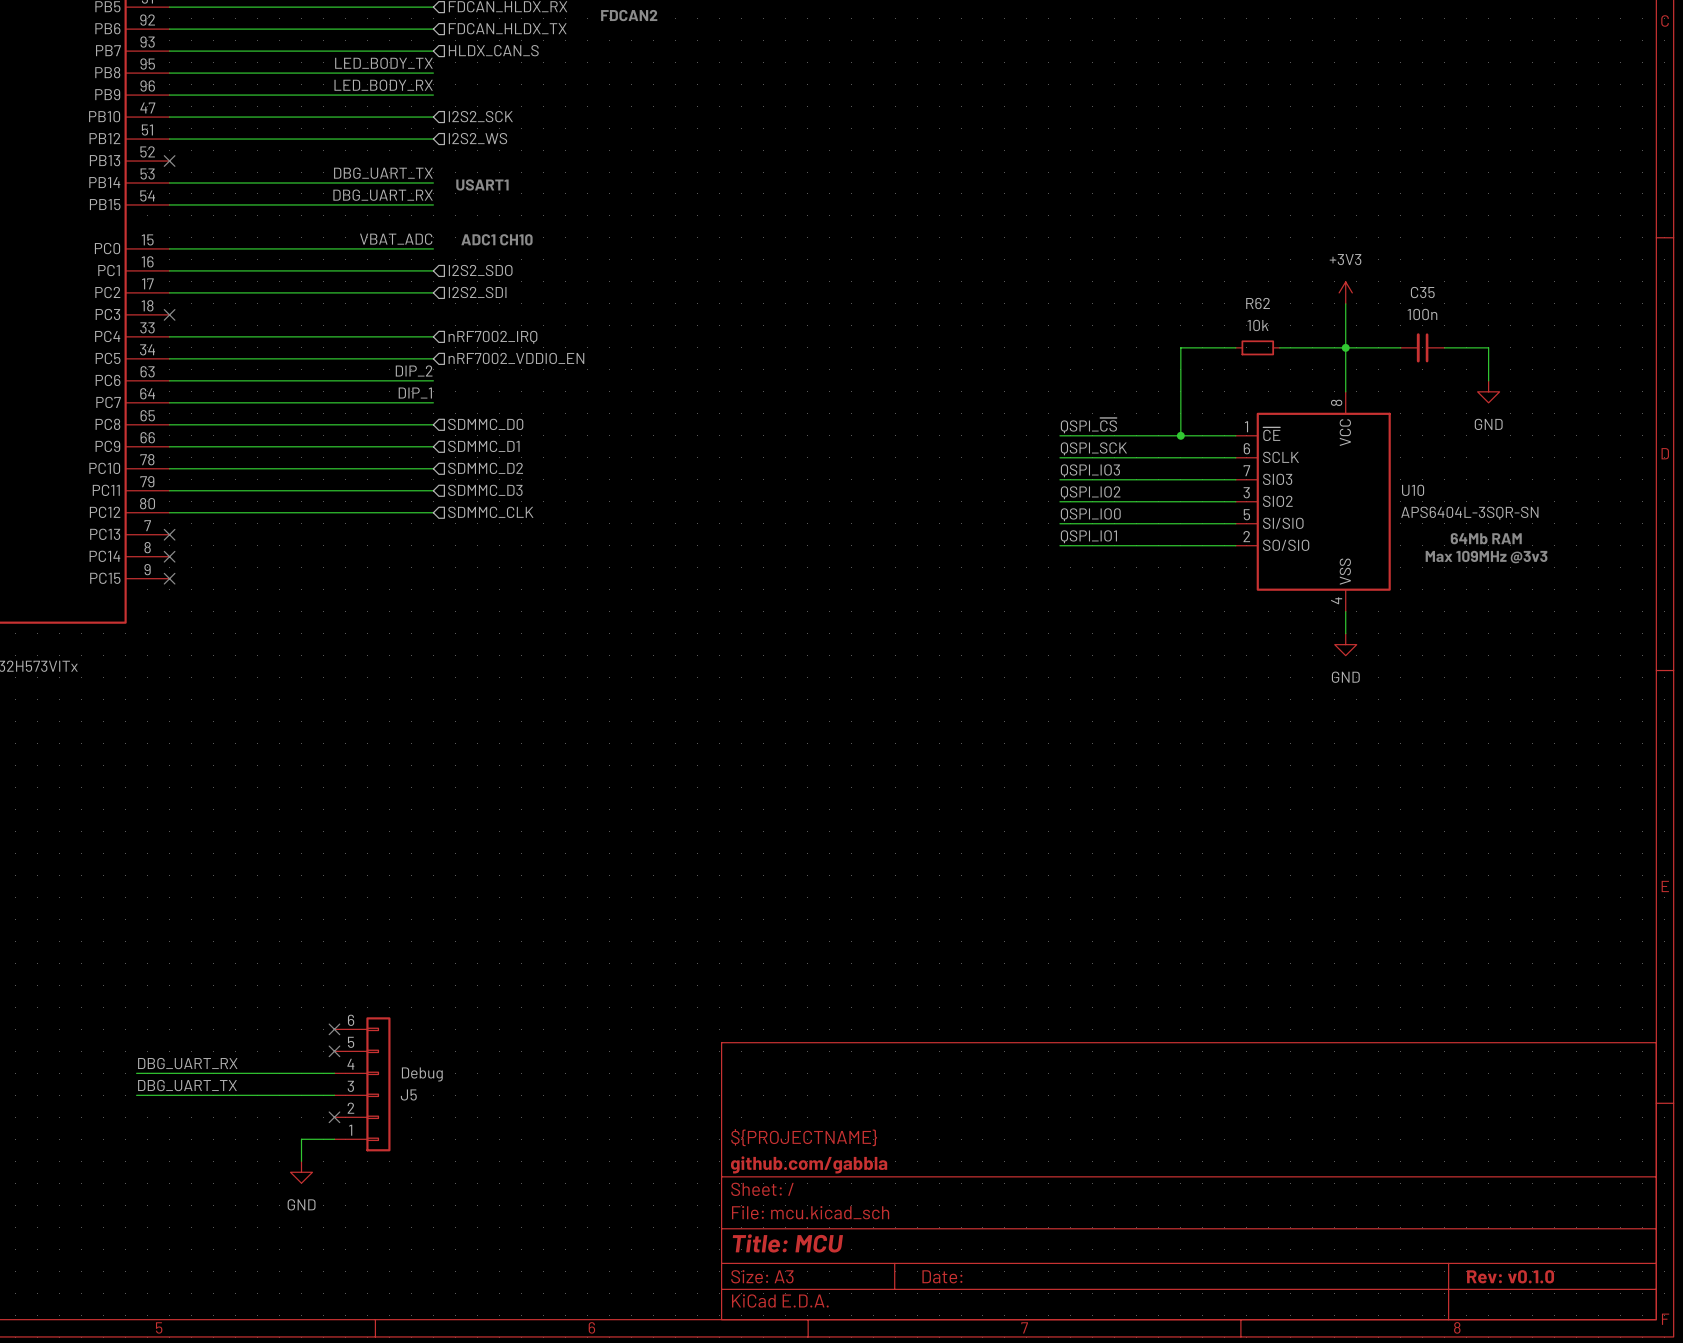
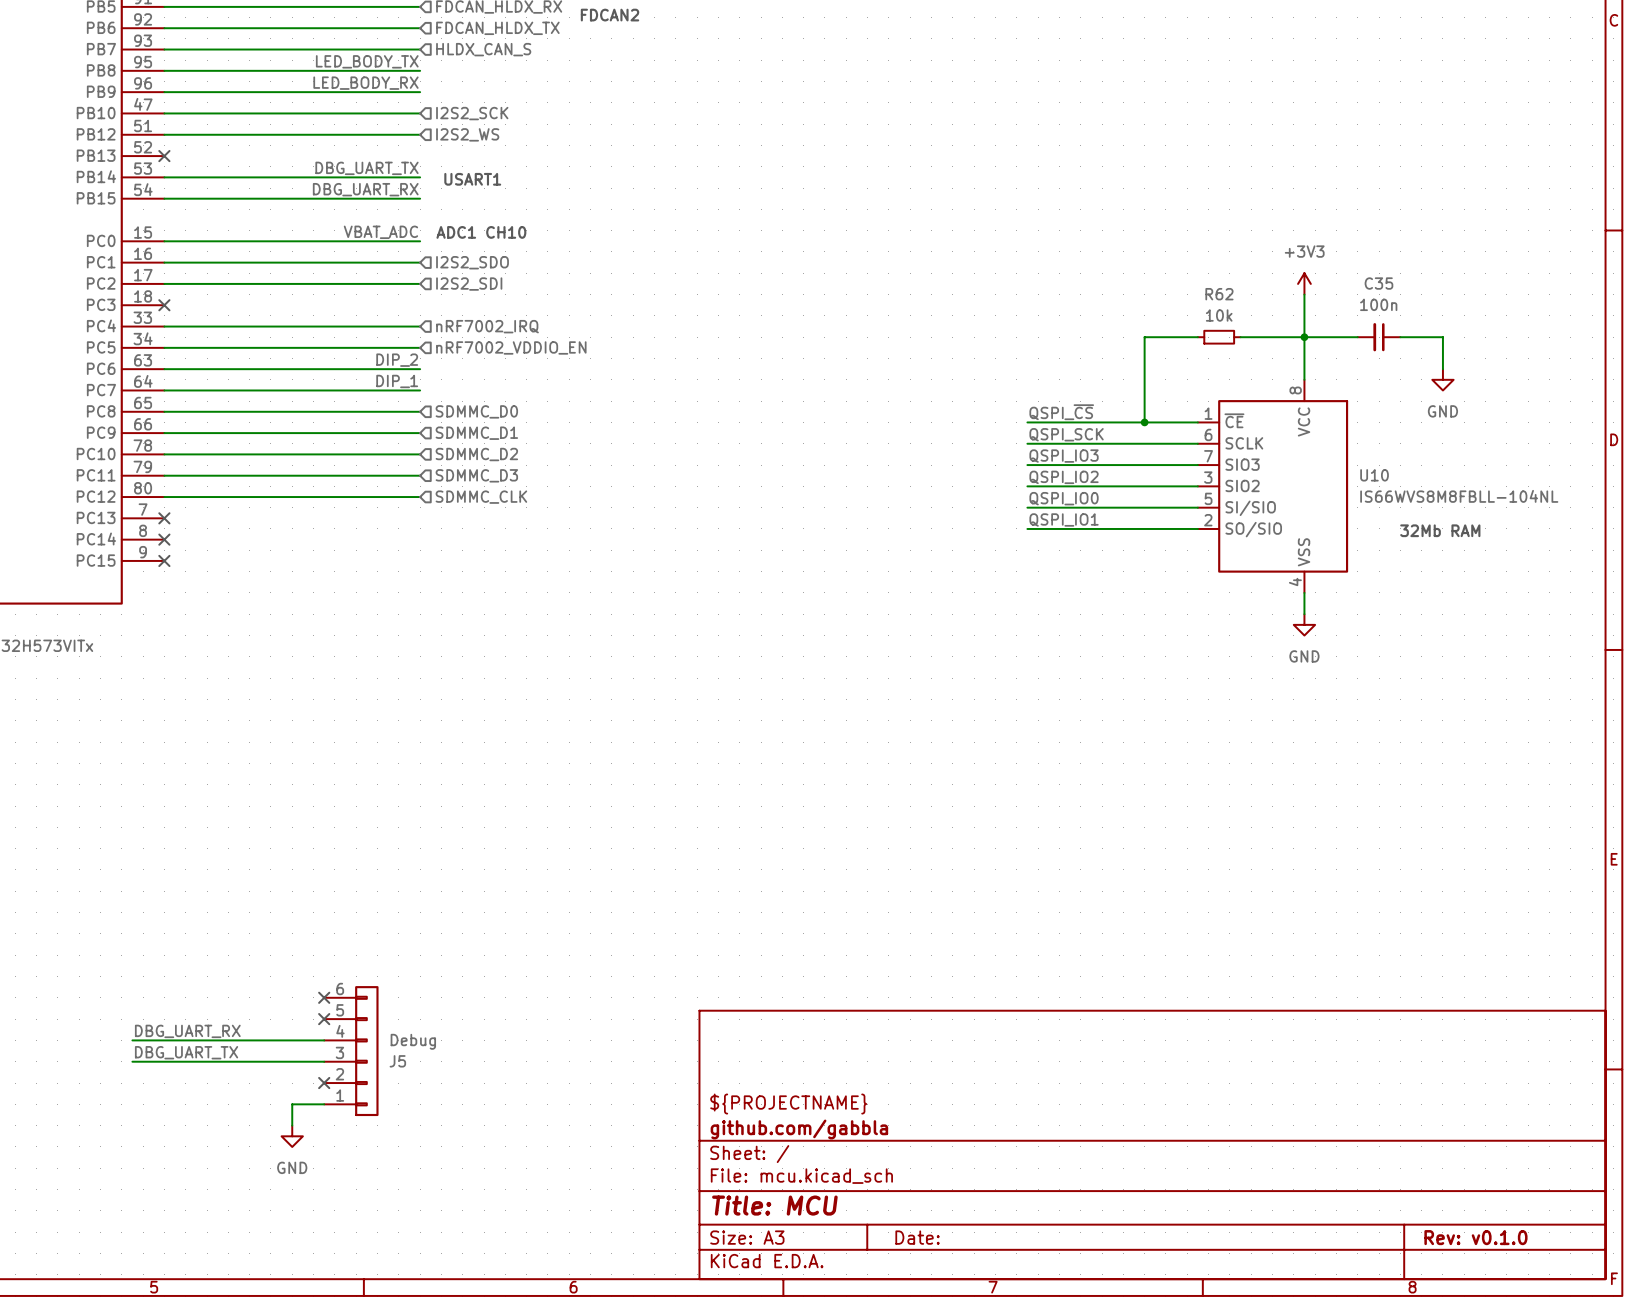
U10 value: APS6404L-3SQR-SN (1469, 513) -> IS66WVS8M8FBLL-104NL (1459, 496)
text: 64Mb RAM (1486, 538) -> 32Mb RAM (1440, 530)
text: Max 109MHz @3v3 (1486, 557) -> none

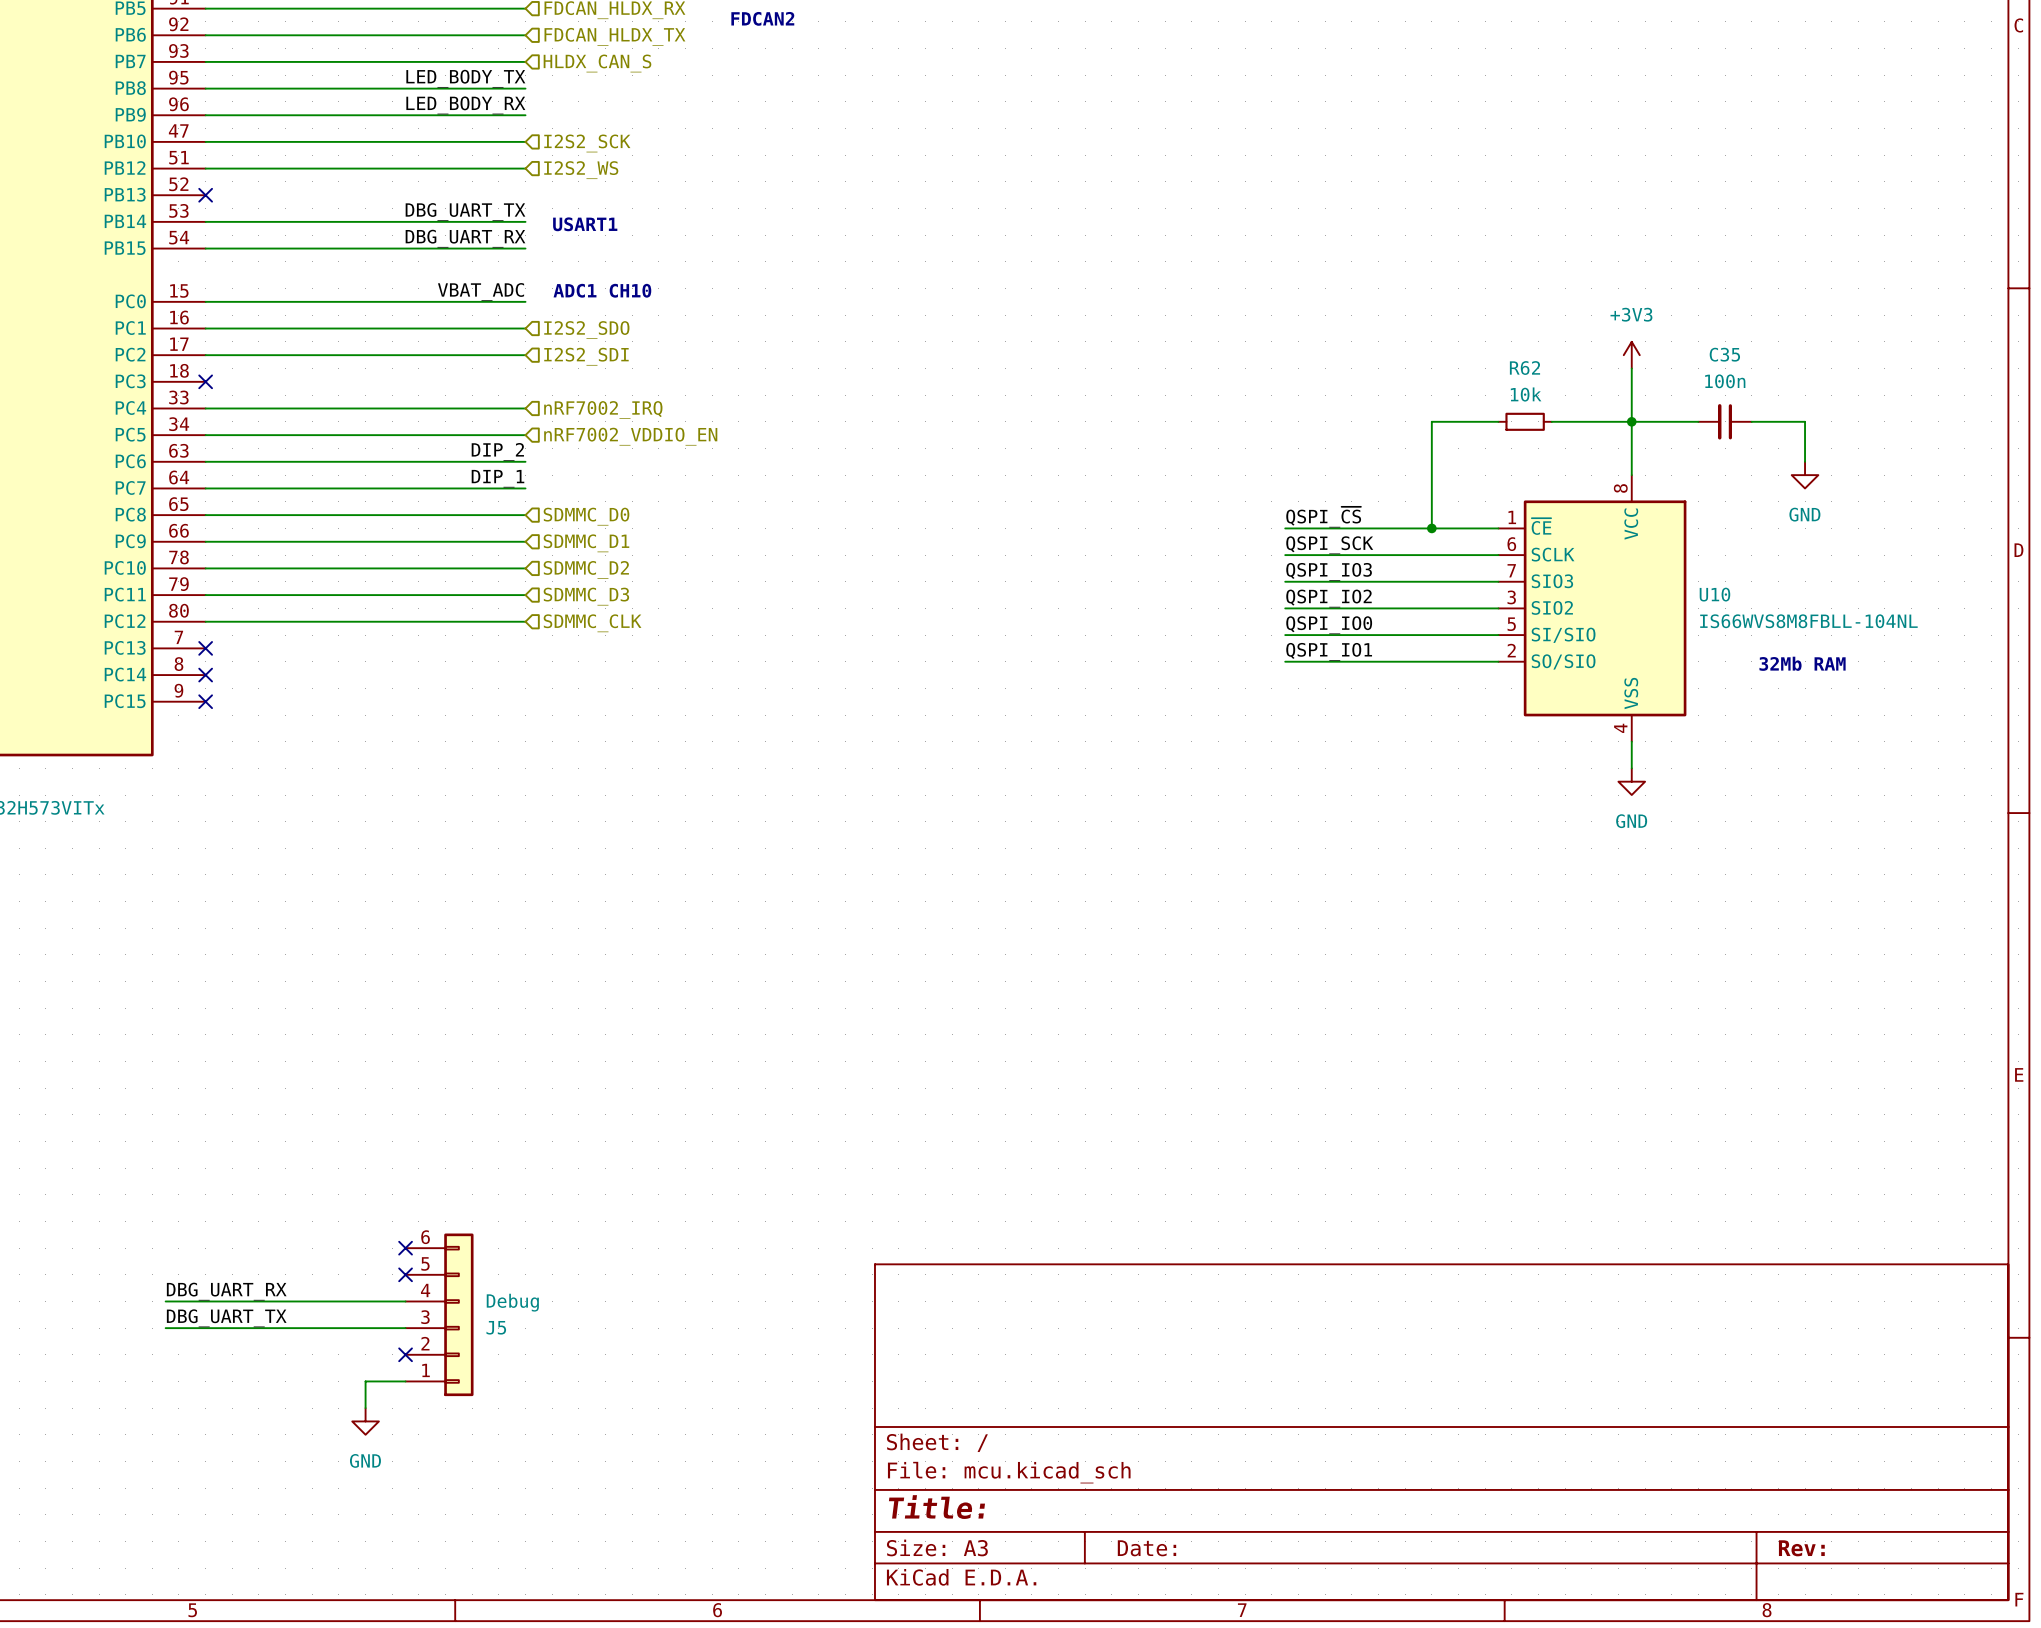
title block: ${PROJECTNAME} (788, 1104) -> none
title block: github.com/gabbla (799, 1129) -> none
title block: Title: MCU (774, 1205) -> Title: (936, 1507)
title block: Rev: v0.1.0 (1475, 1237) -> Rev: (1801, 1548)

